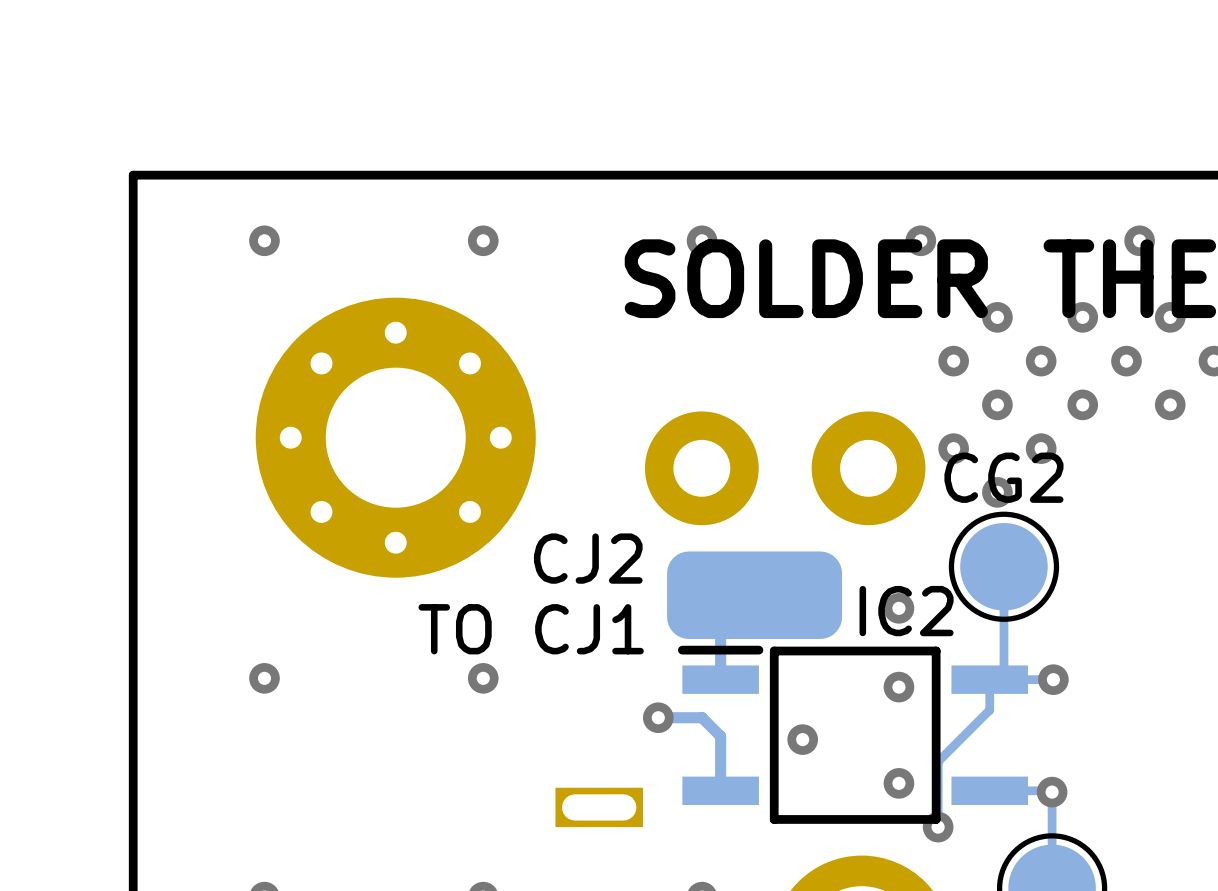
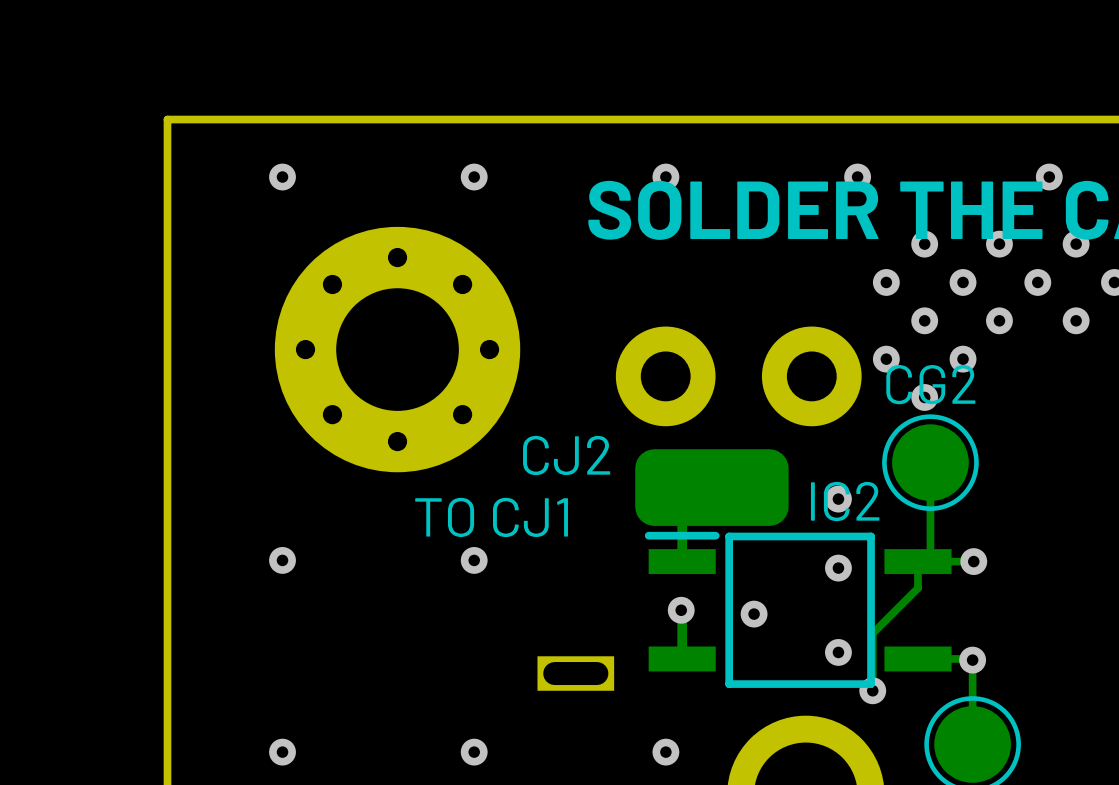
track: (658, 717) (702, 717) (719, 735) -> none
via position: (658, 717) -> (681, 610)

